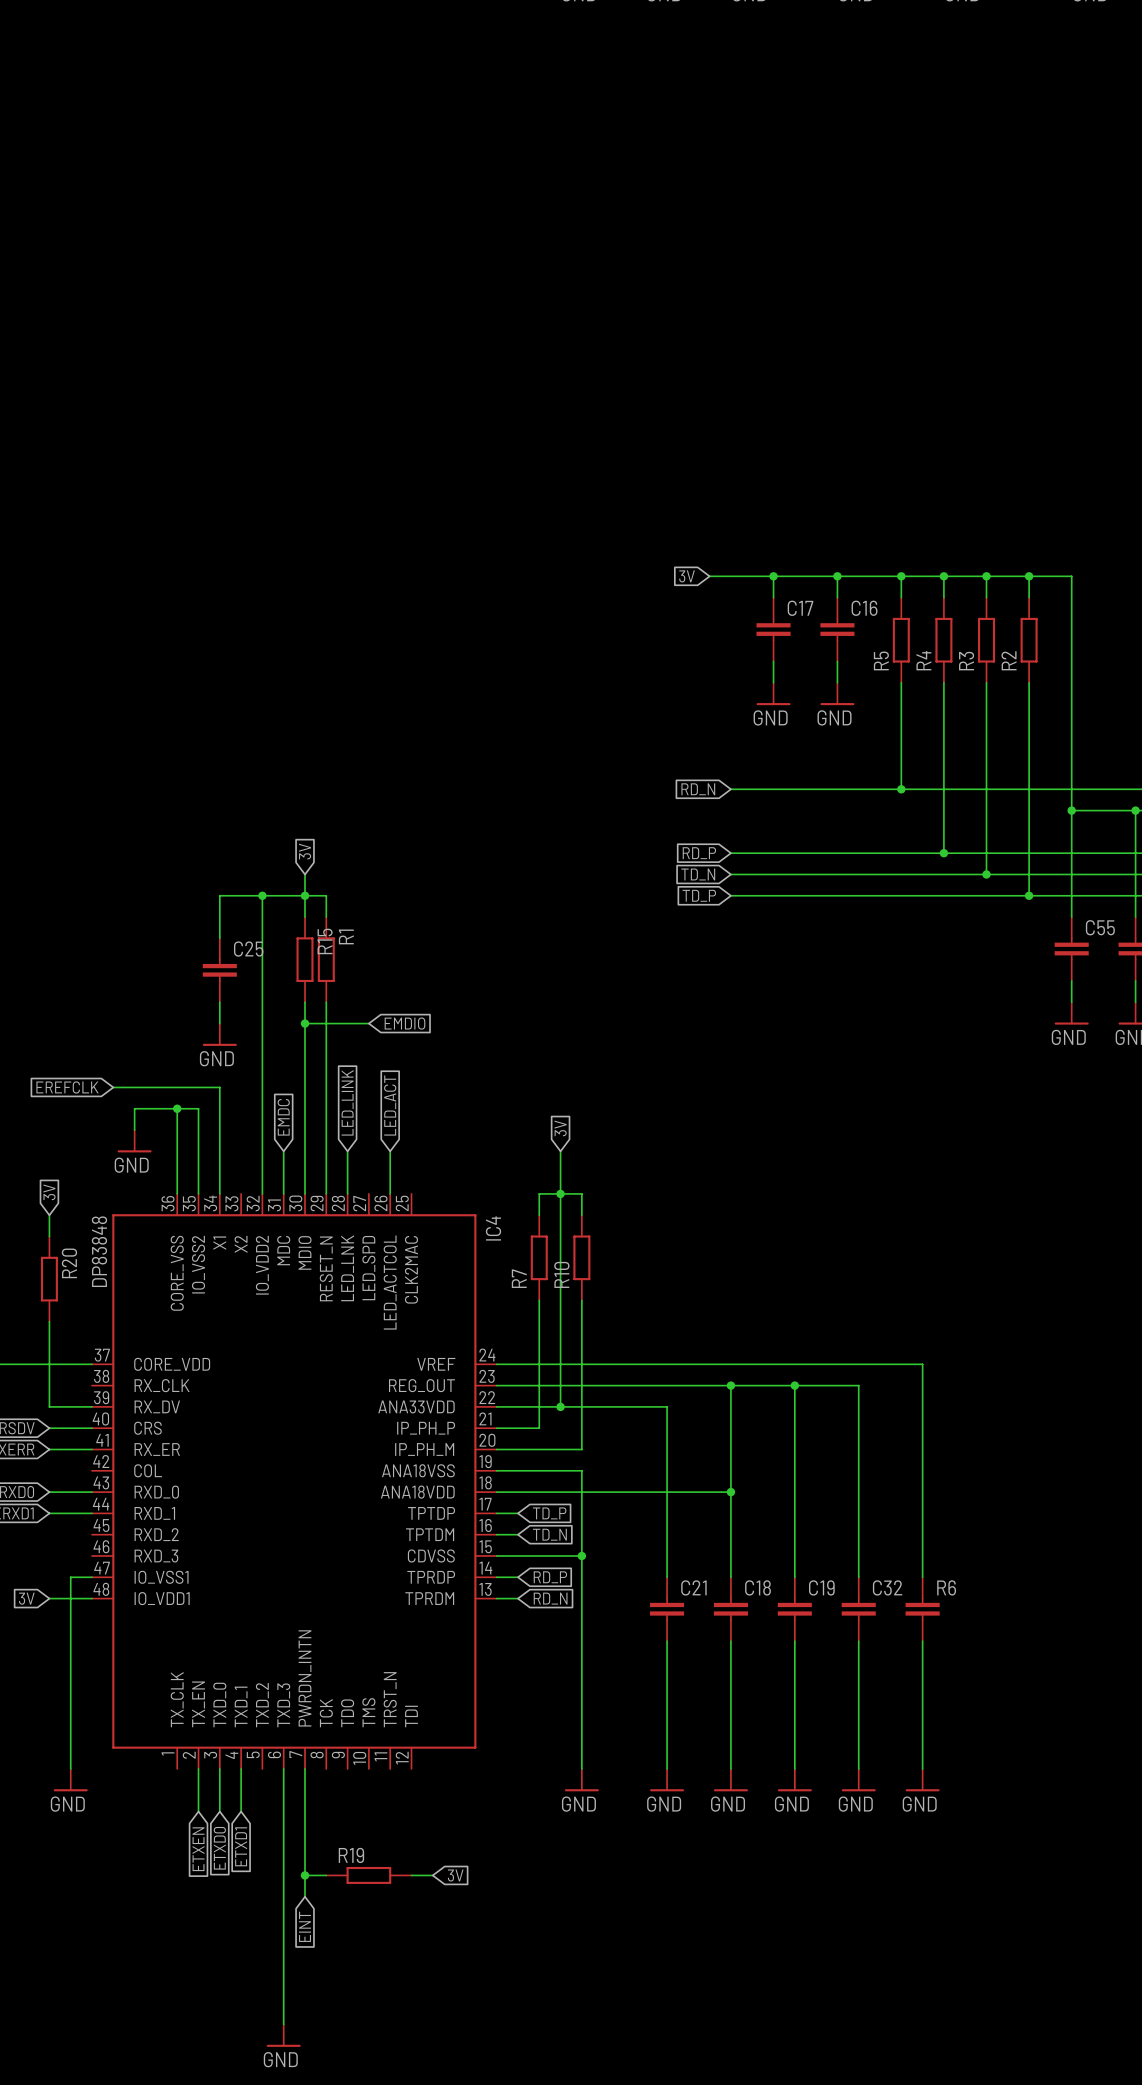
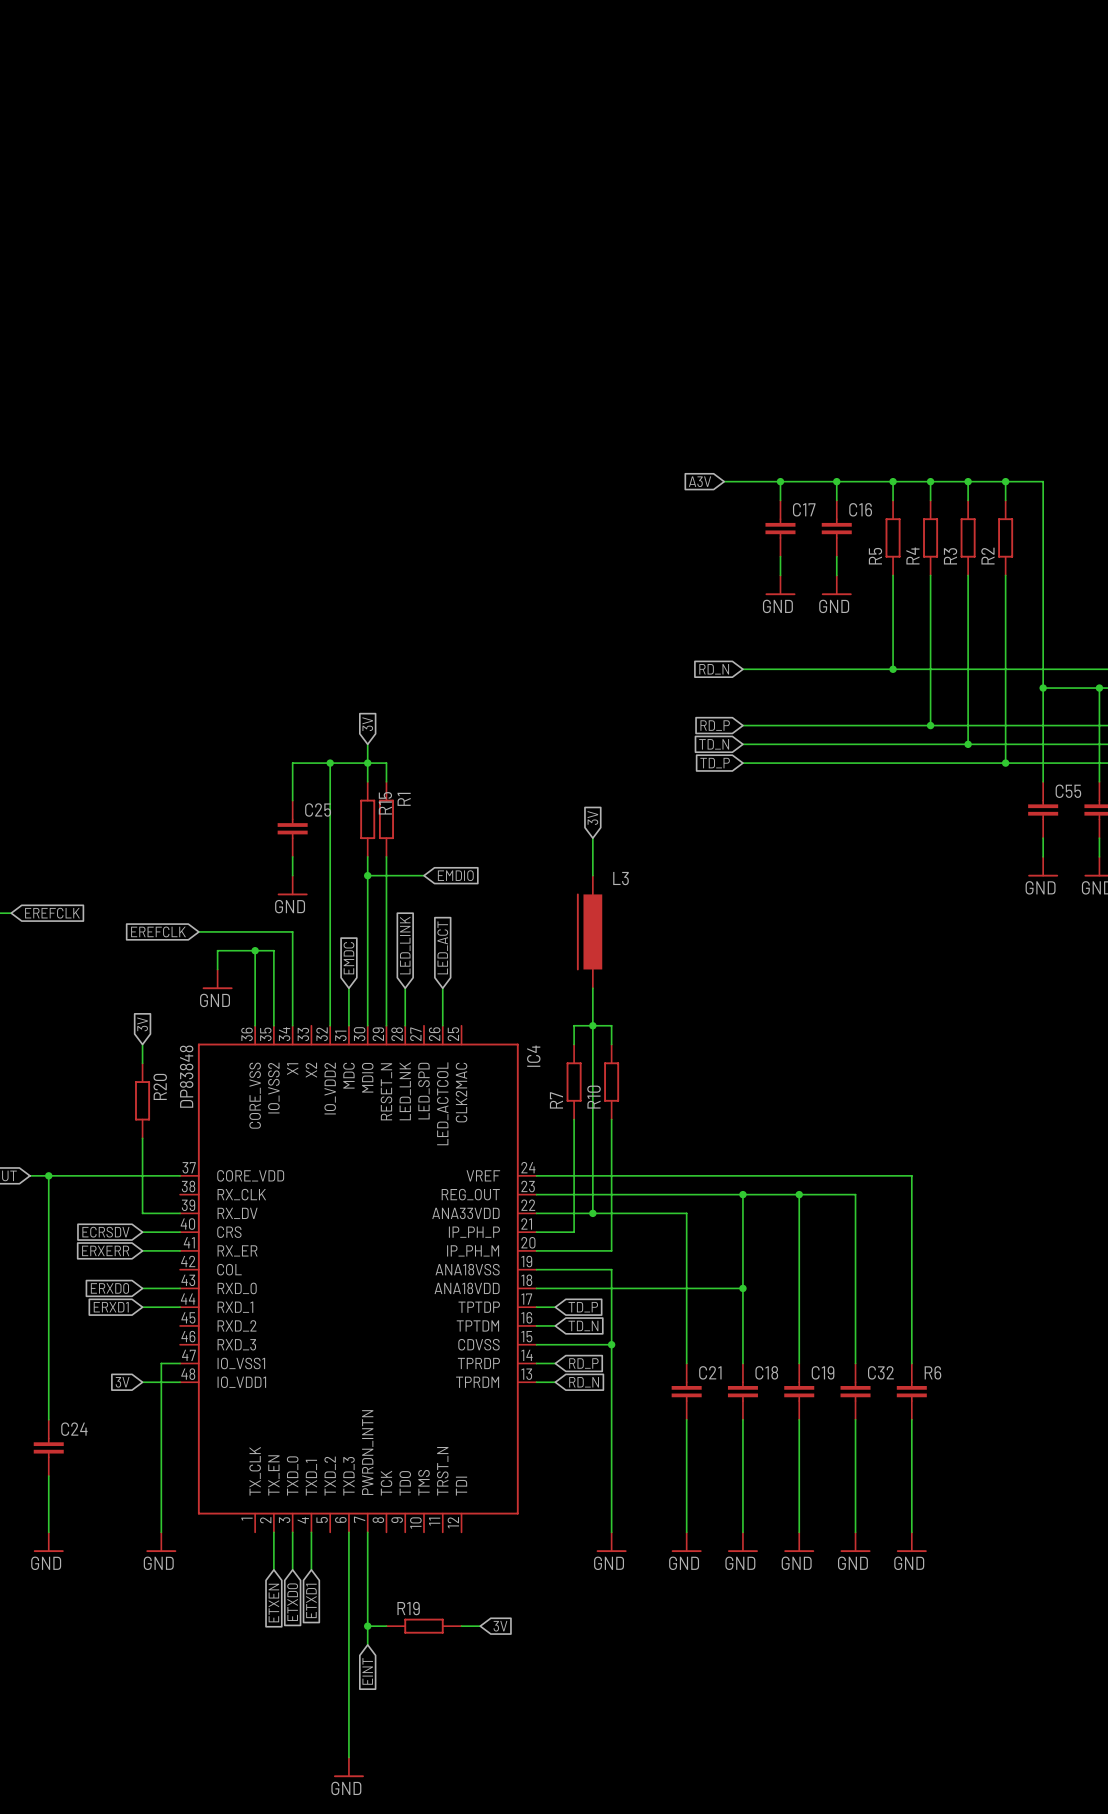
global label: 3V (687, 576) -> A3V (700, 481)
wire: none -> (592, 838) (592, 875)
L3: none -> (589, 931)
global label position: 3V (560, 1128) -> 3V (592, 817)

